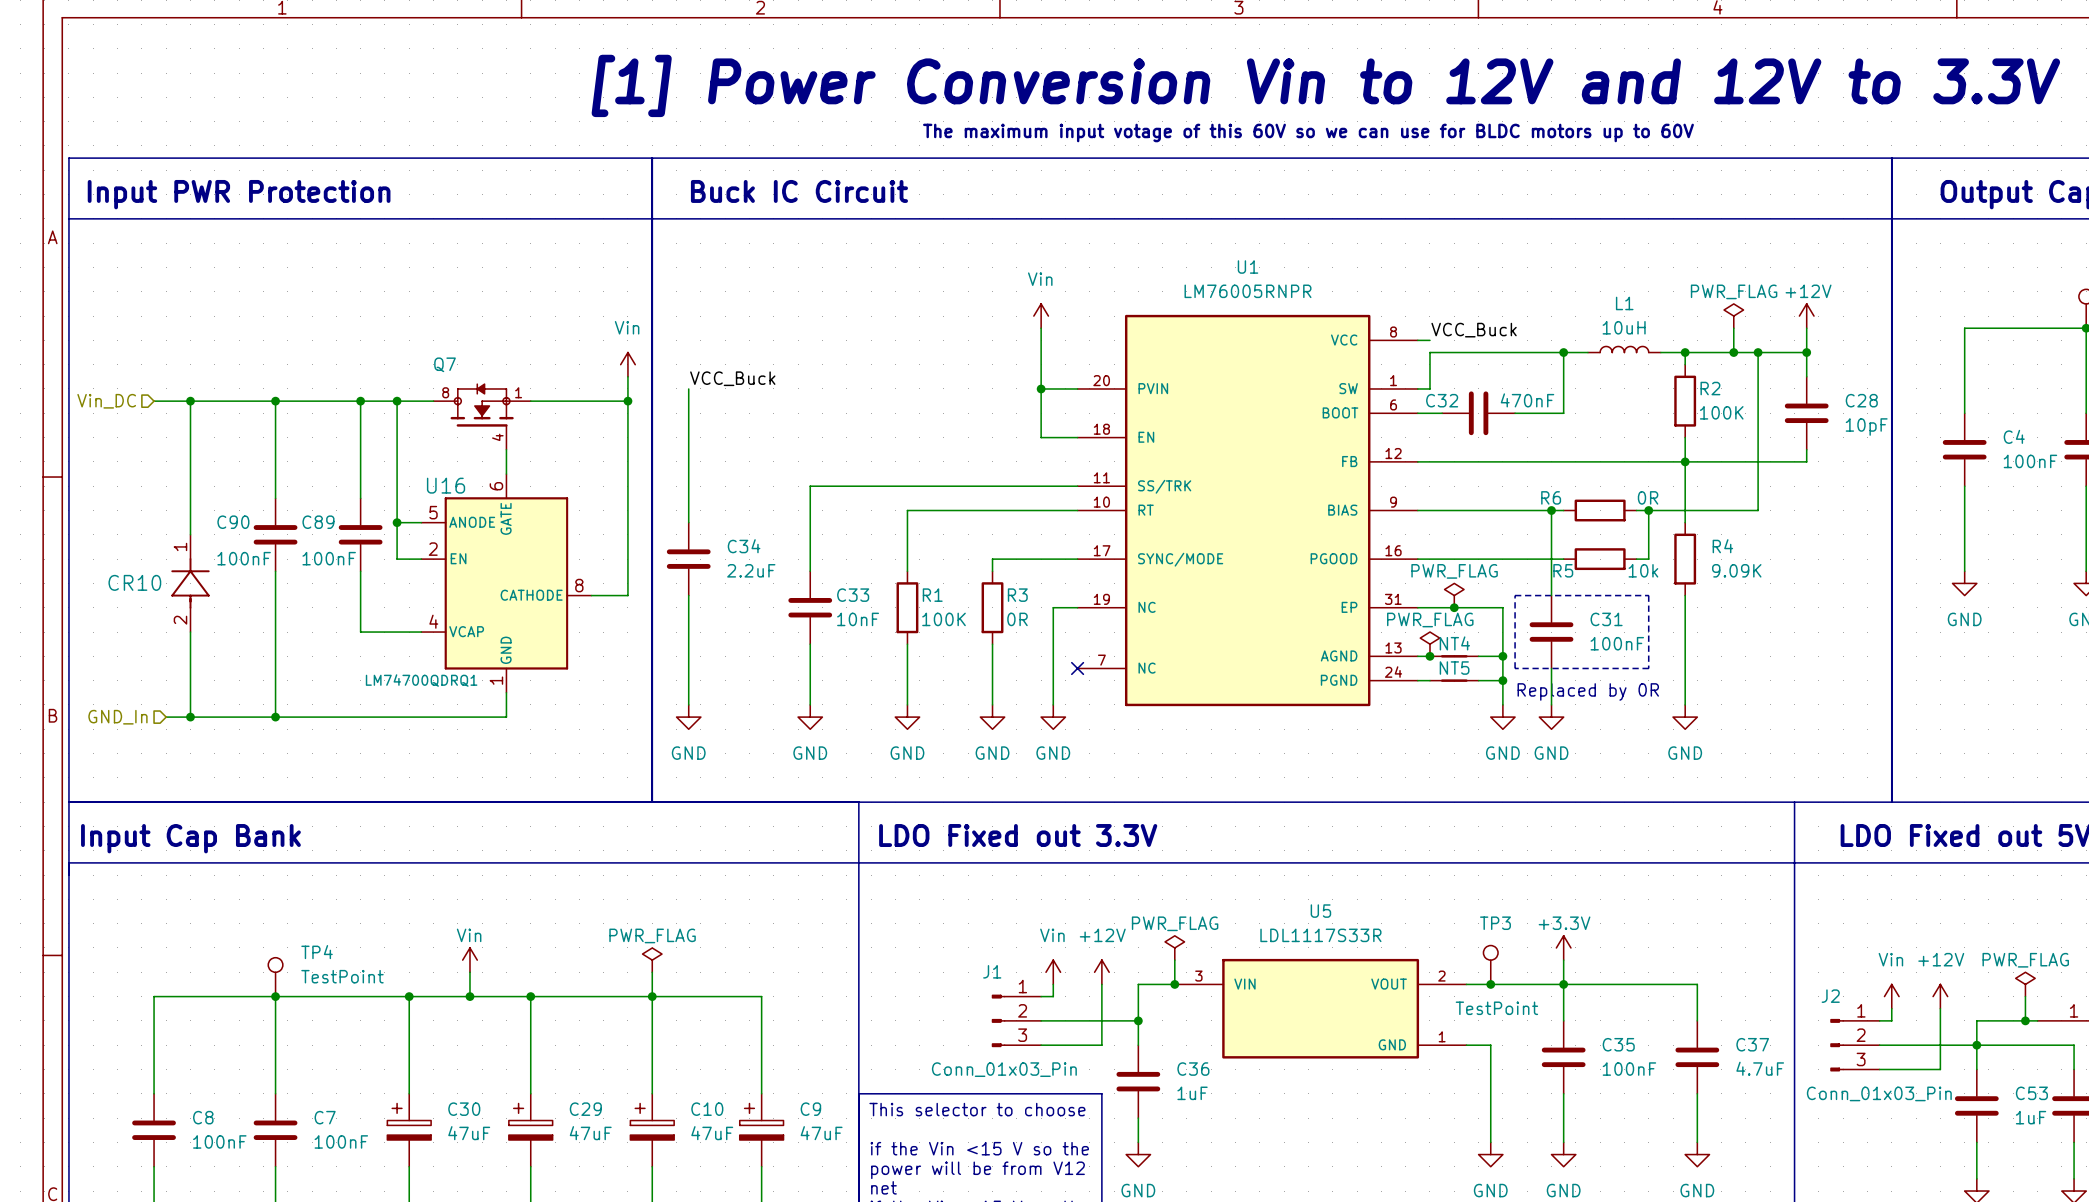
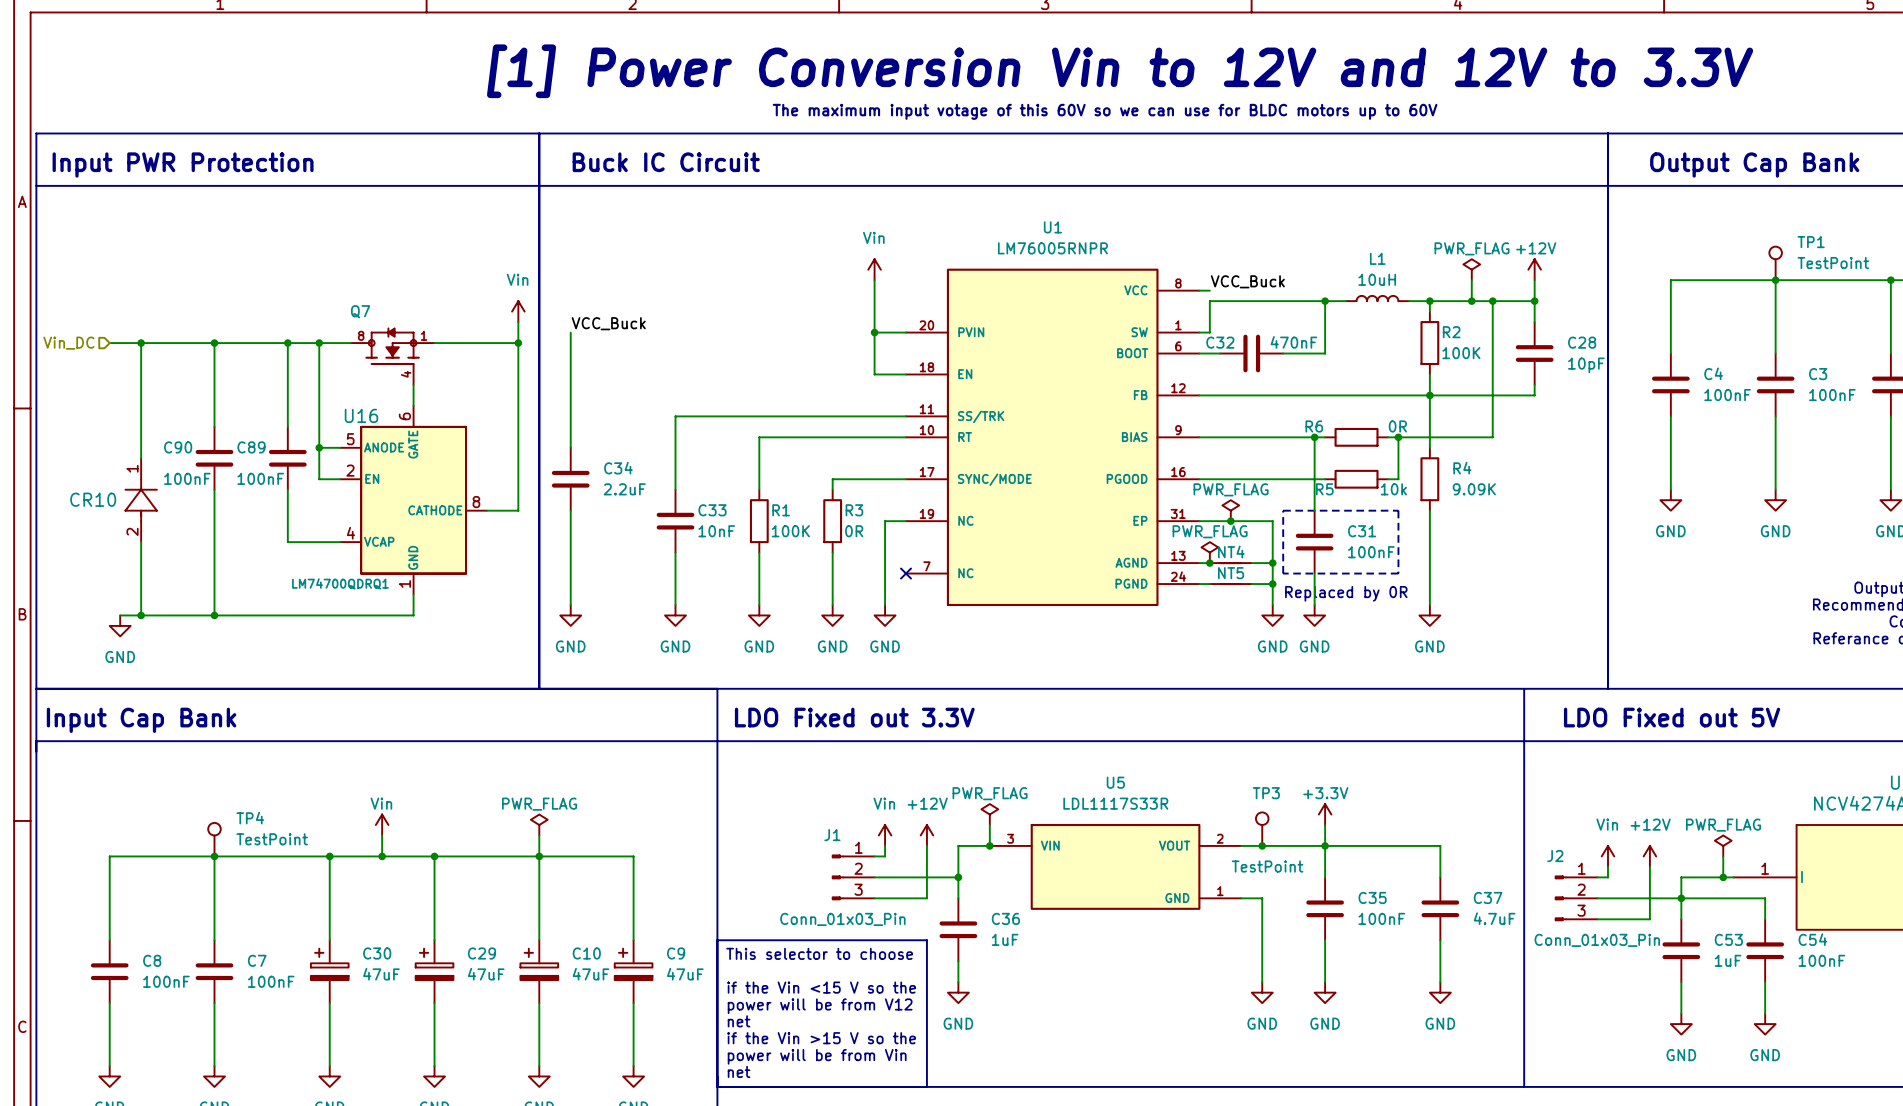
hierarchical label: GND_In (117, 717) -> none
power symbol: none -> GND (120, 625)

